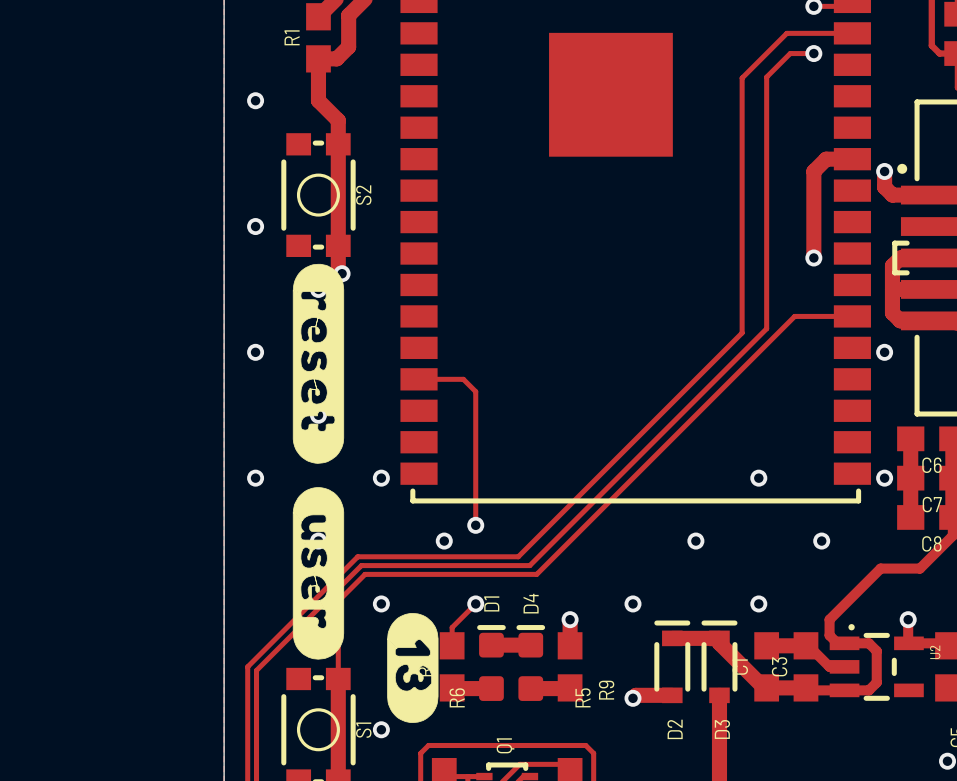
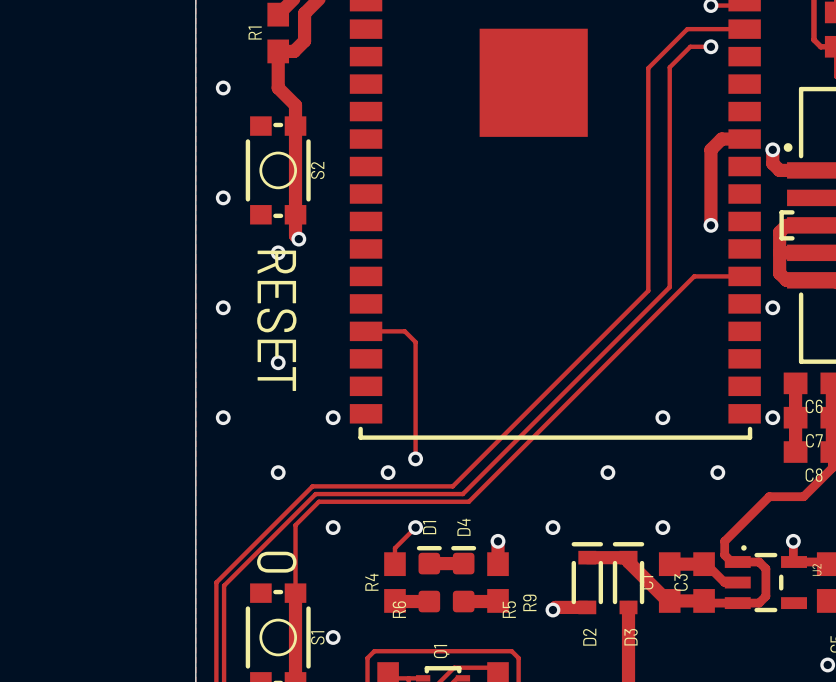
drawing: [292, 263, 345, 660] -> none
text: none -> RESET (276, 320)
drawing: [387, 613, 439, 723] -> none
text: none -> 0 (276, 562)

